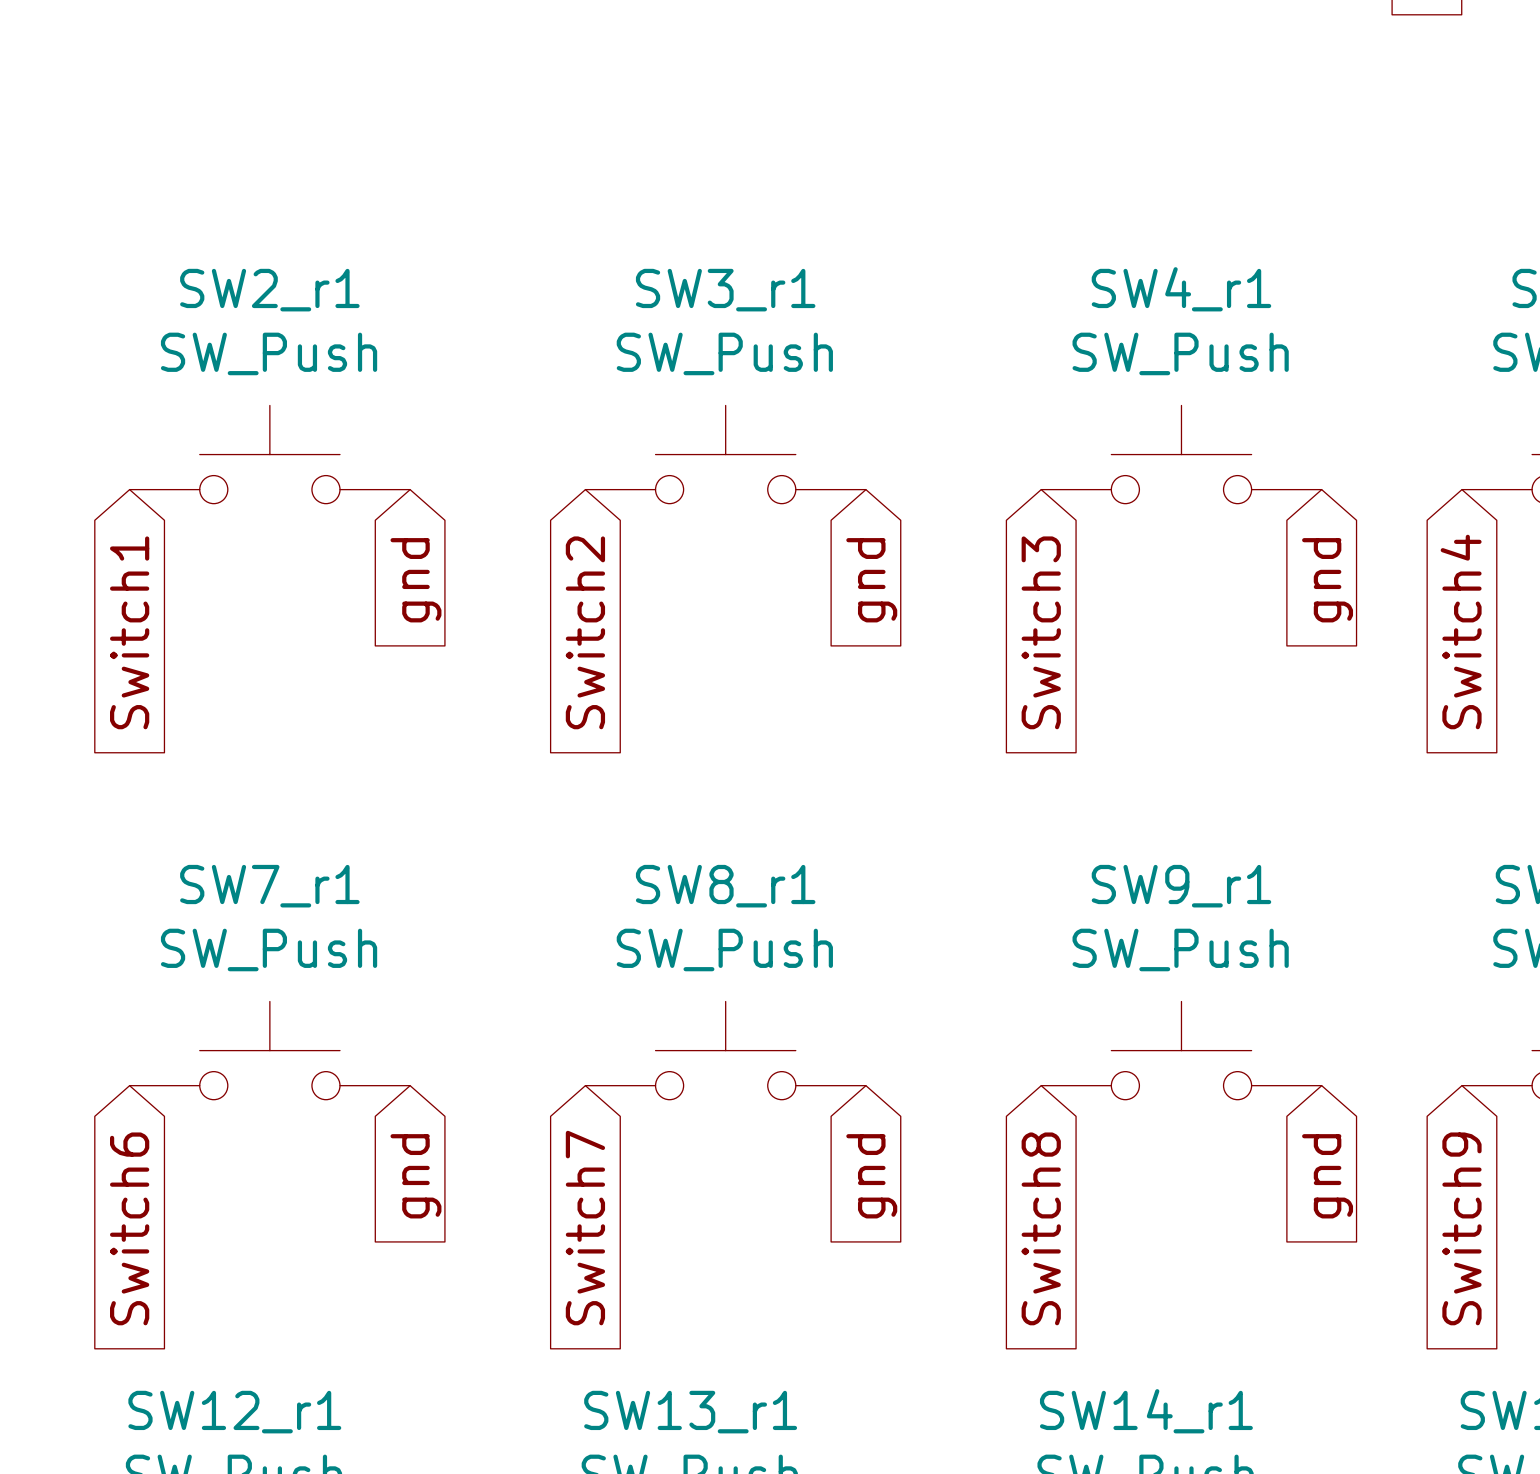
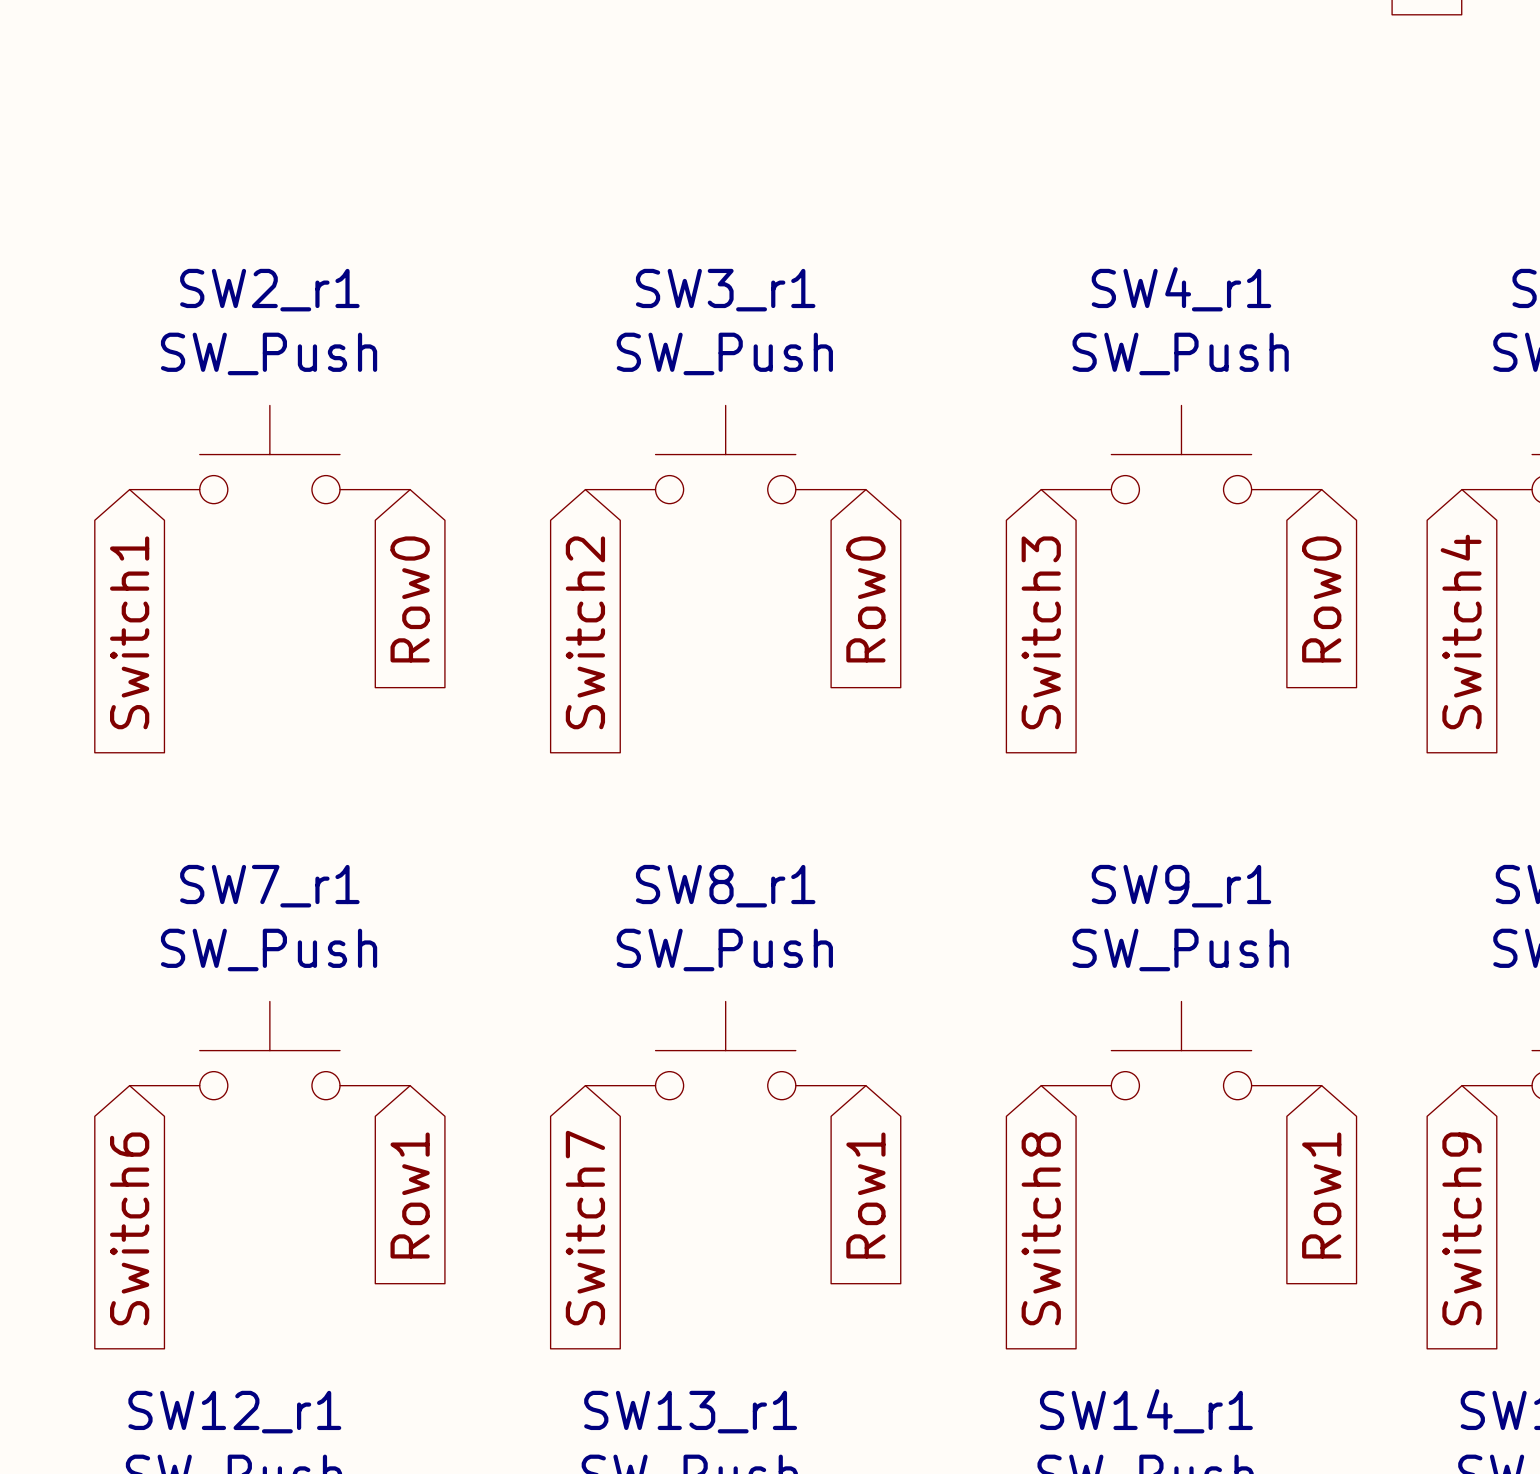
global label: gnd (415, 580) -> Row0 (410, 599)
global label: gnd (871, 580) -> Row0 (865, 599)
global label: gnd (1327, 580) -> Row0 (1321, 599)
global label: gnd (415, 1176) -> Row1 (410, 1195)
global label: gnd (871, 1176) -> Row1 (865, 1195)
global label: gnd (1327, 1176) -> Row1 (1321, 1195)

